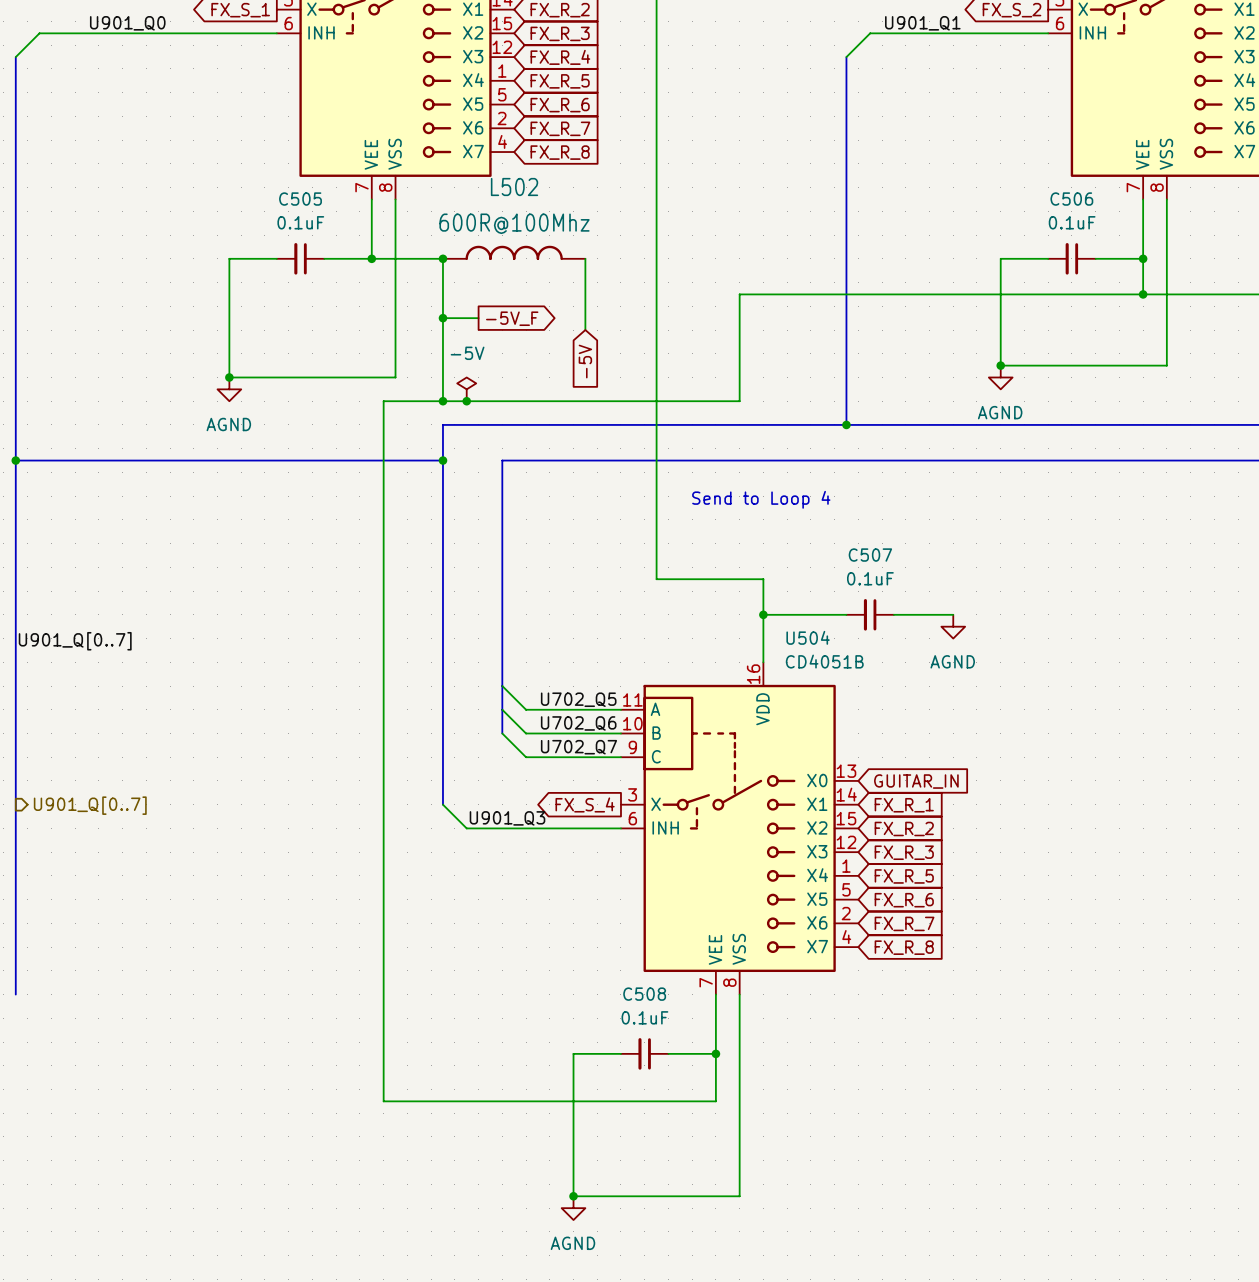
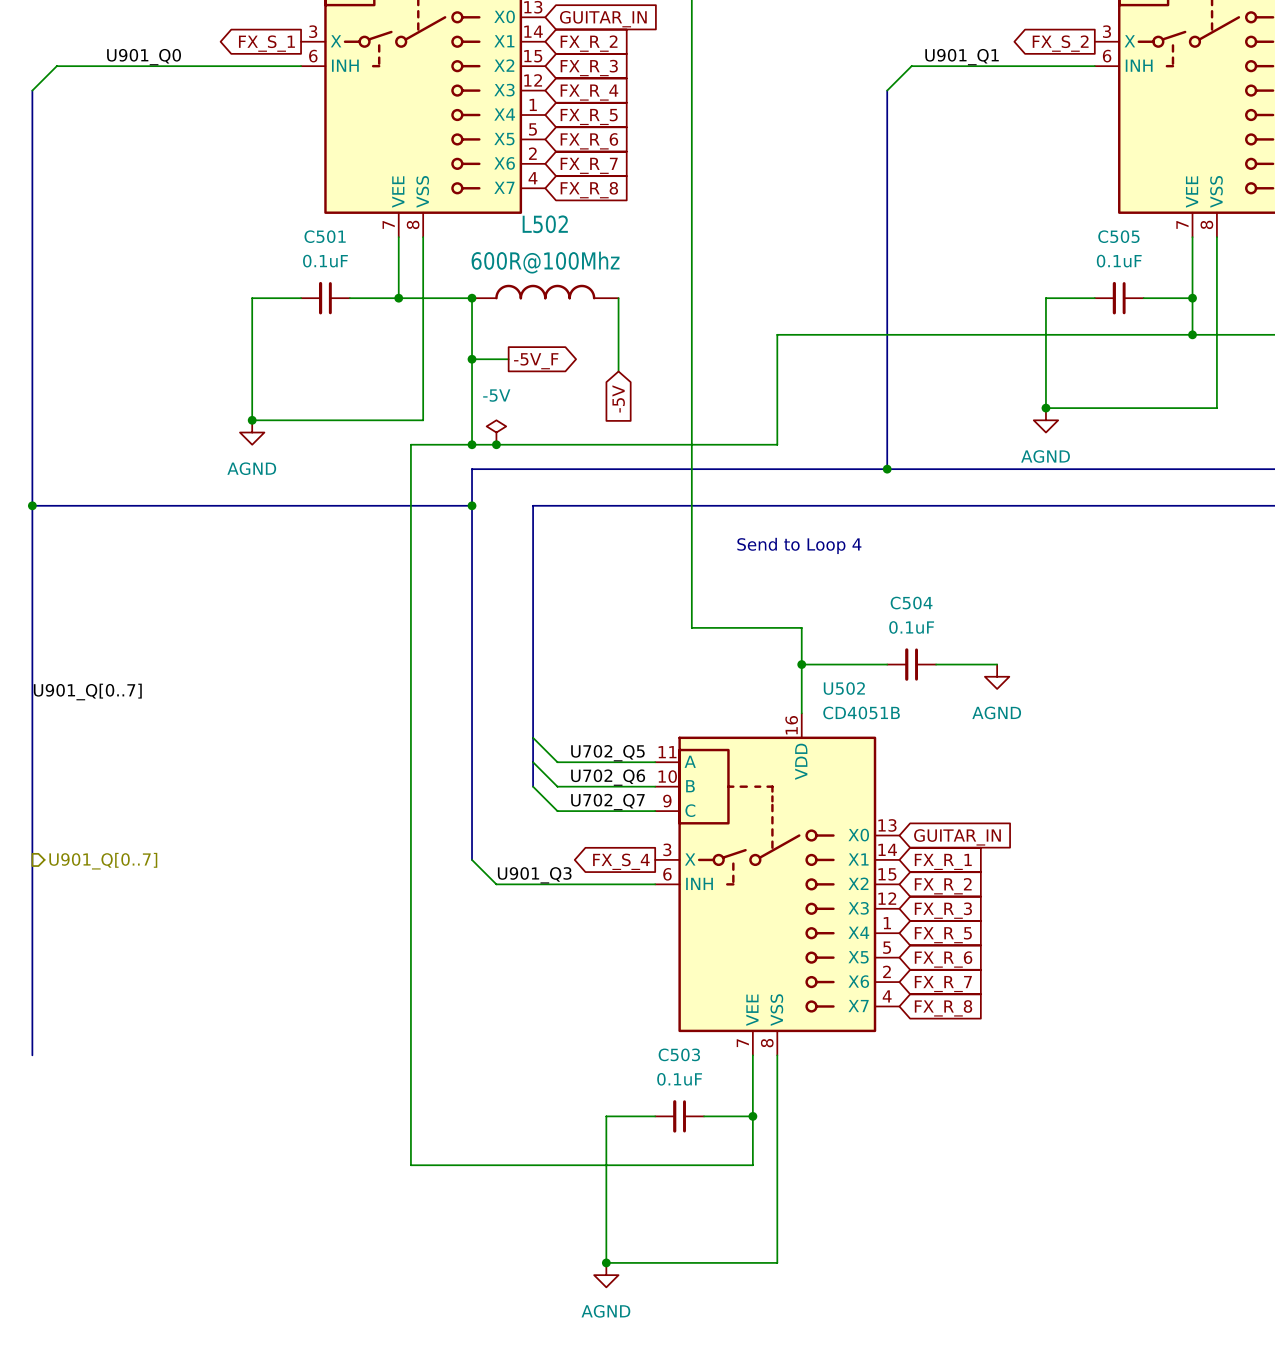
C505 name: C505 (300, 199) -> C501 (325, 236)
C506 name: C506 (1071, 199) -> C505 (1118, 236)
C507 name: C507 (870, 555) -> C504 (911, 603)
U504 name: U504 (808, 637) -> U502 (844, 688)
C508 name: C508 (644, 994) -> C503 (679, 1054)

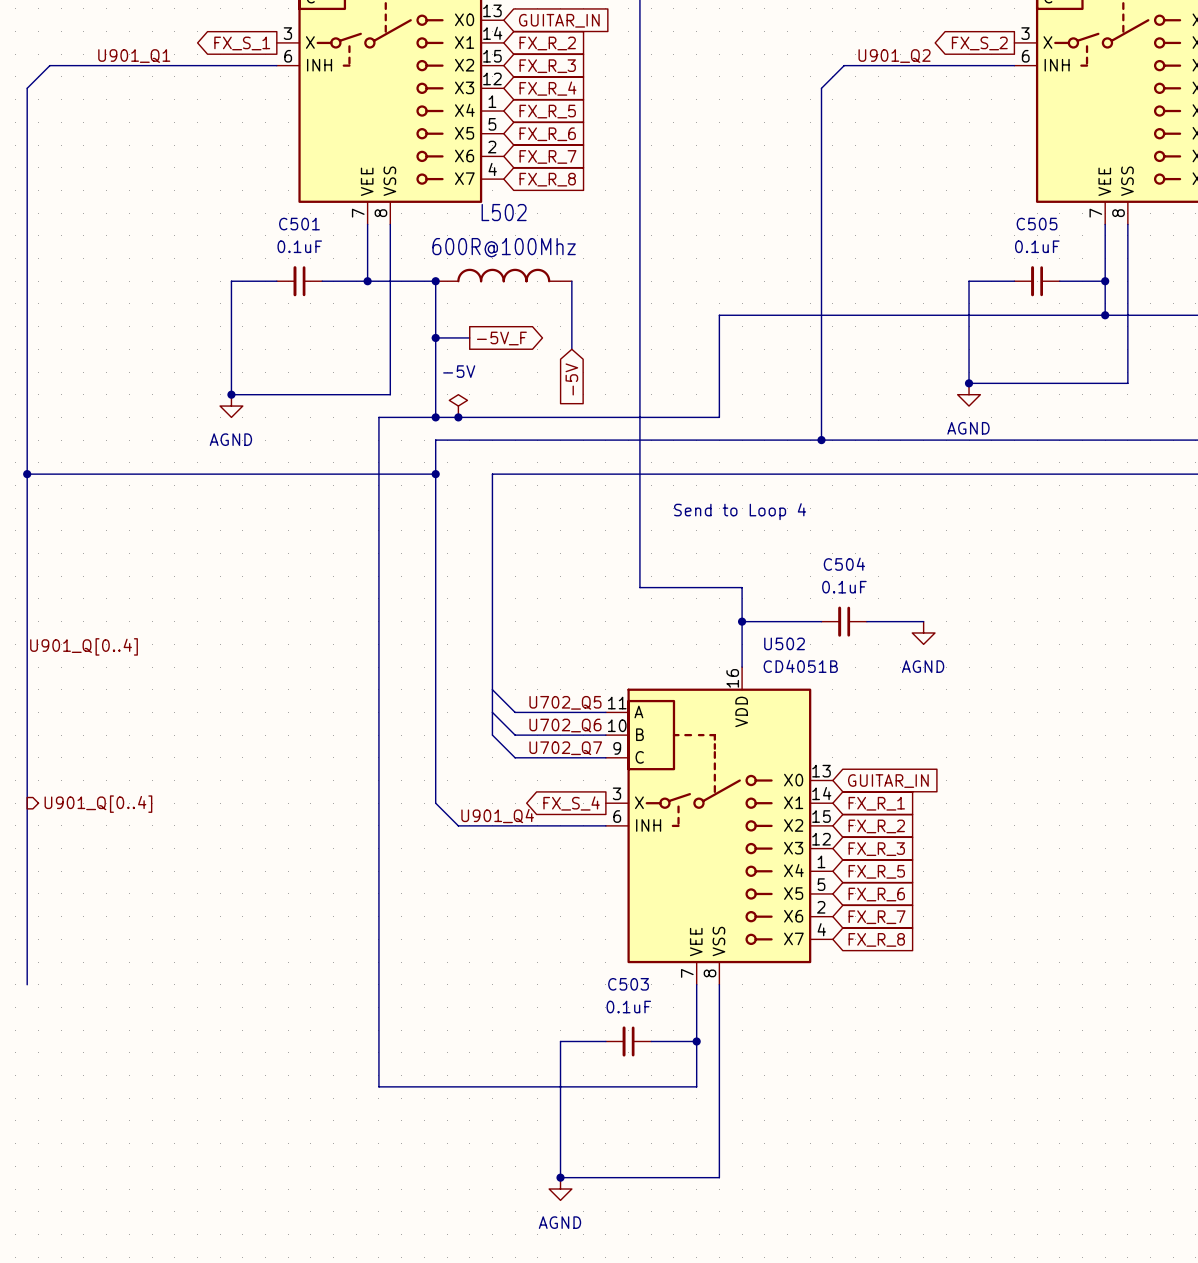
label: U901_Q0 (144, 57) -> U901_Q1 (134, 56)
label: U901_Q1 (962, 57) -> U901_Q2 (894, 56)
label: U901_Q[0..7] (87, 692) -> U901_Q[0..4] (84, 646)
hierarchical label: U901_Q[0..7] (103, 861) -> U901_Q[0..4] (98, 804)
label: U901_Q3 (534, 875) -> U901_Q4 (497, 816)

